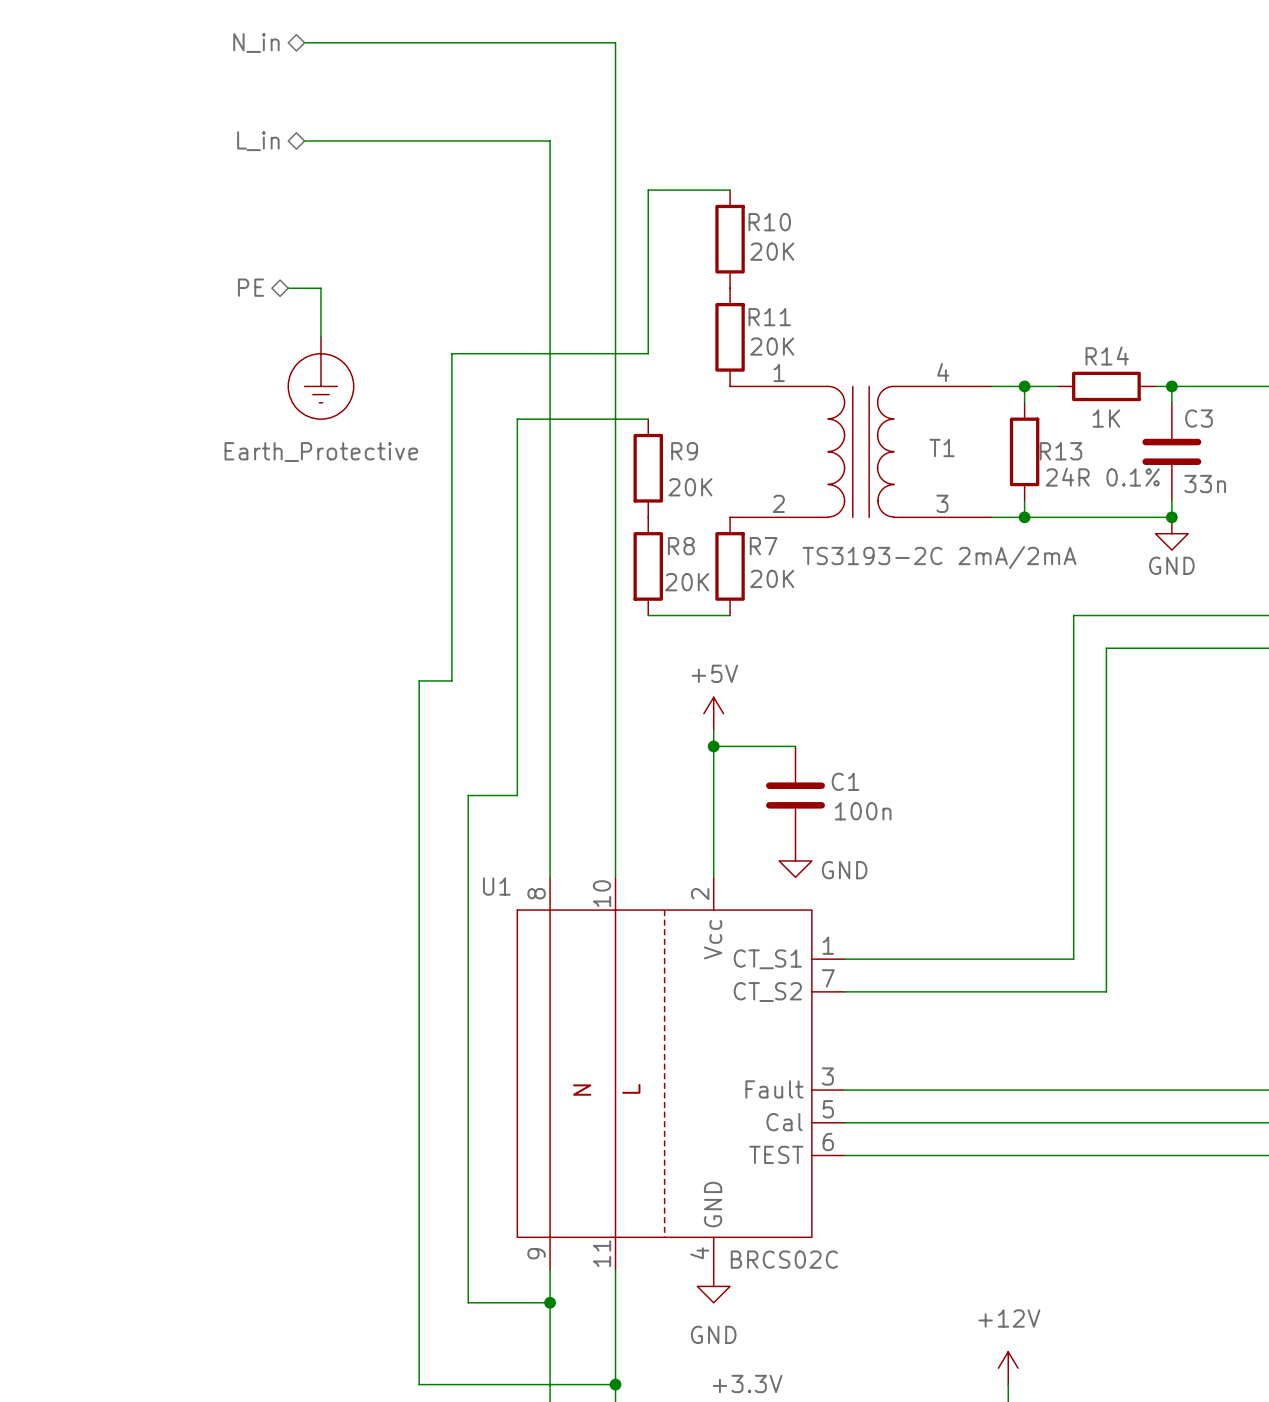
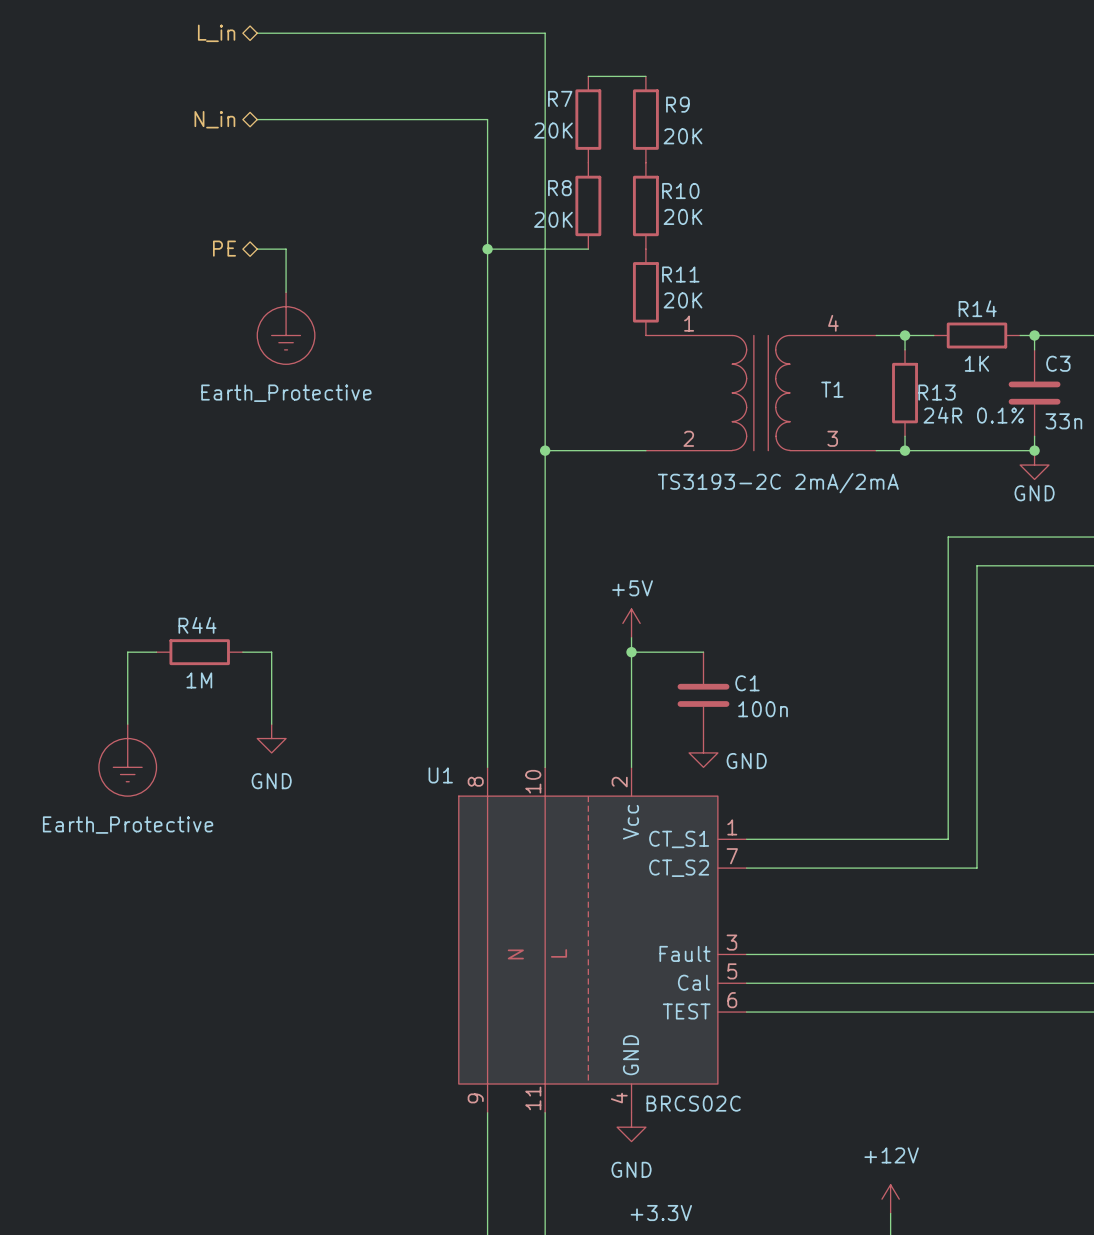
hierarchical label position: N_in (256, 42) -> N_in (214, 119)
wire: none -> (257, 33) (271, 33)
wire: none -> (588, 76) (645, 76)
wire: none -> (257, 119) (271, 119)
hierarchical label position: L_in (258, 141) -> L_in (216, 33)
wire: (730, 190) (648, 190) (648, 353) (451, 353) (451, 680) (419, 680) (419, 1384) (615, 1384) -> none
wire: none -> (487, 249) (588, 249)
junction: none -> (487, 249)
wire: (648, 419) (517, 419) (517, 795) (468, 795) (468, 1302) (550, 1302) -> none
R9 position: (648, 468) -> (645, 119)
wire: none -> (545, 450) (645, 450)
junction: none -> (545, 450)
R8 name position: R8 (681, 546) -> R8 (559, 188)
R7 name position: R7 (763, 546) -> R7 (560, 98)
T1 value position: TS3193-2C 2mA/2mA (939, 557) -> TS3193-2C 2mA/2mA (778, 483)
R8 position: (648, 566) -> (588, 205)
R7 position: (730, 566) -> (588, 119)
R7 value position: 20K (772, 578) -> 20K (553, 130)
R8 value position: 20K (687, 582) -> 20K (553, 219)
wire: (648, 615) (730, 615) -> none
wire: none -> (156, 652) (127, 652) (127, 724)
R44: none -> 1M (199, 652)
wire: none -> (242, 652) (271, 652) (271, 724)
power symbol: none -> GND (271, 738)
power symbol: none -> Earth_Protective (127, 760)
junction: (550, 1302) -> none
junction: (615, 1384) -> none

